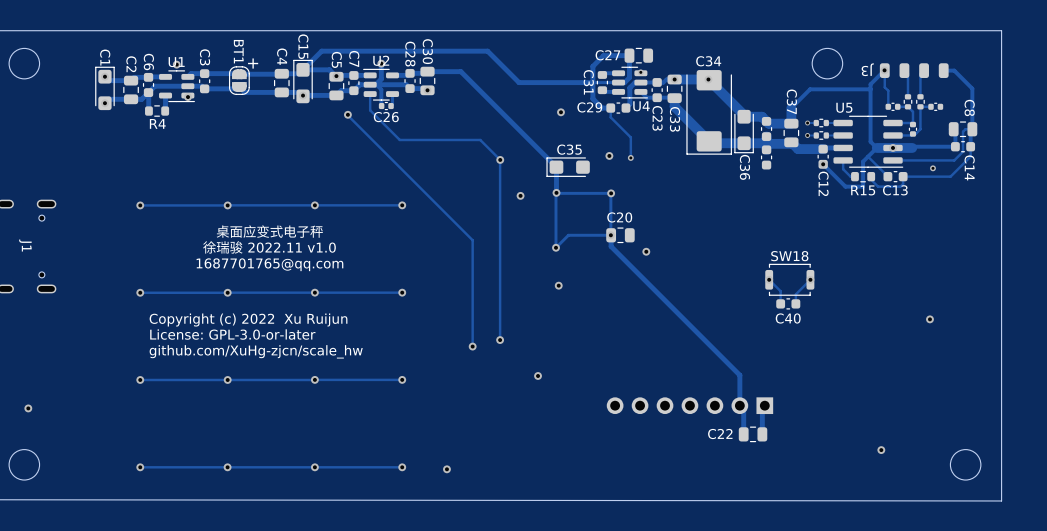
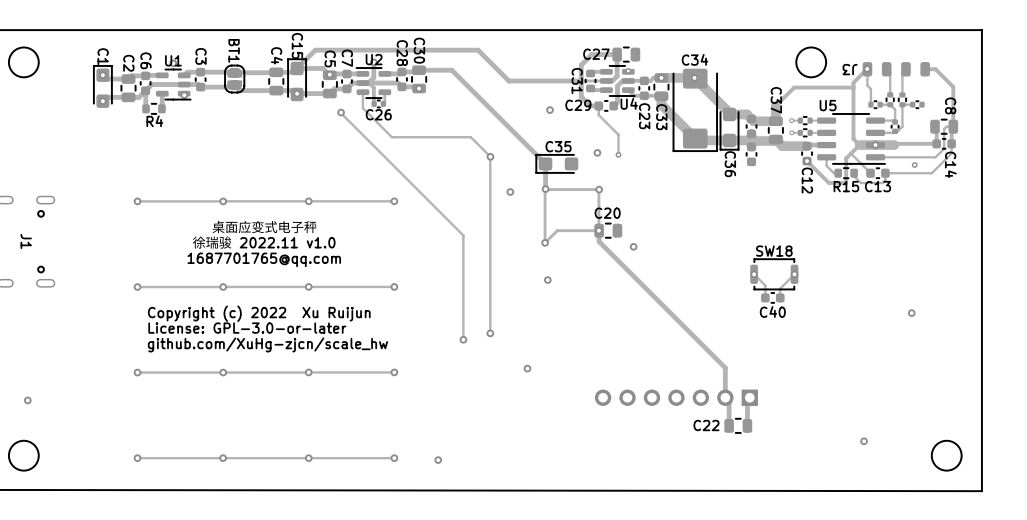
text: + (253, 63) -> none

